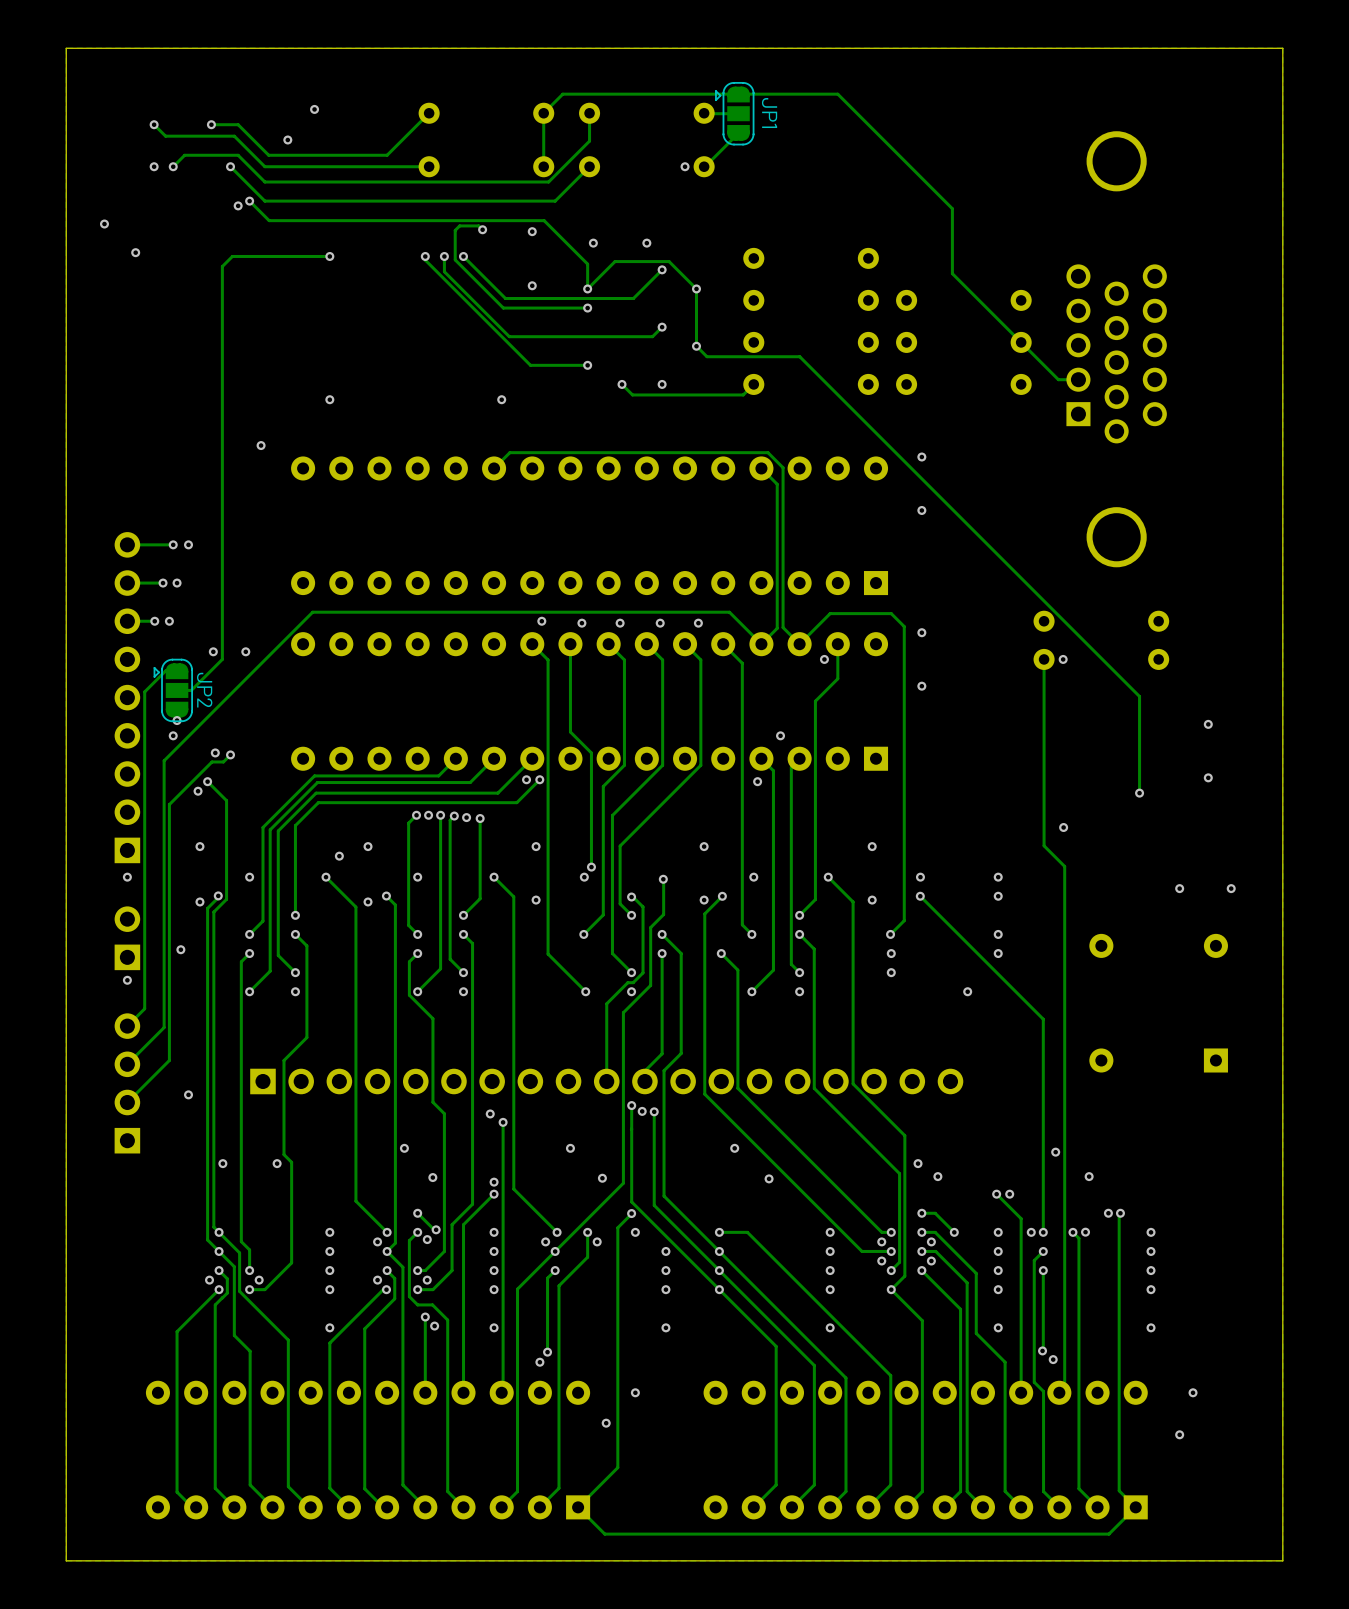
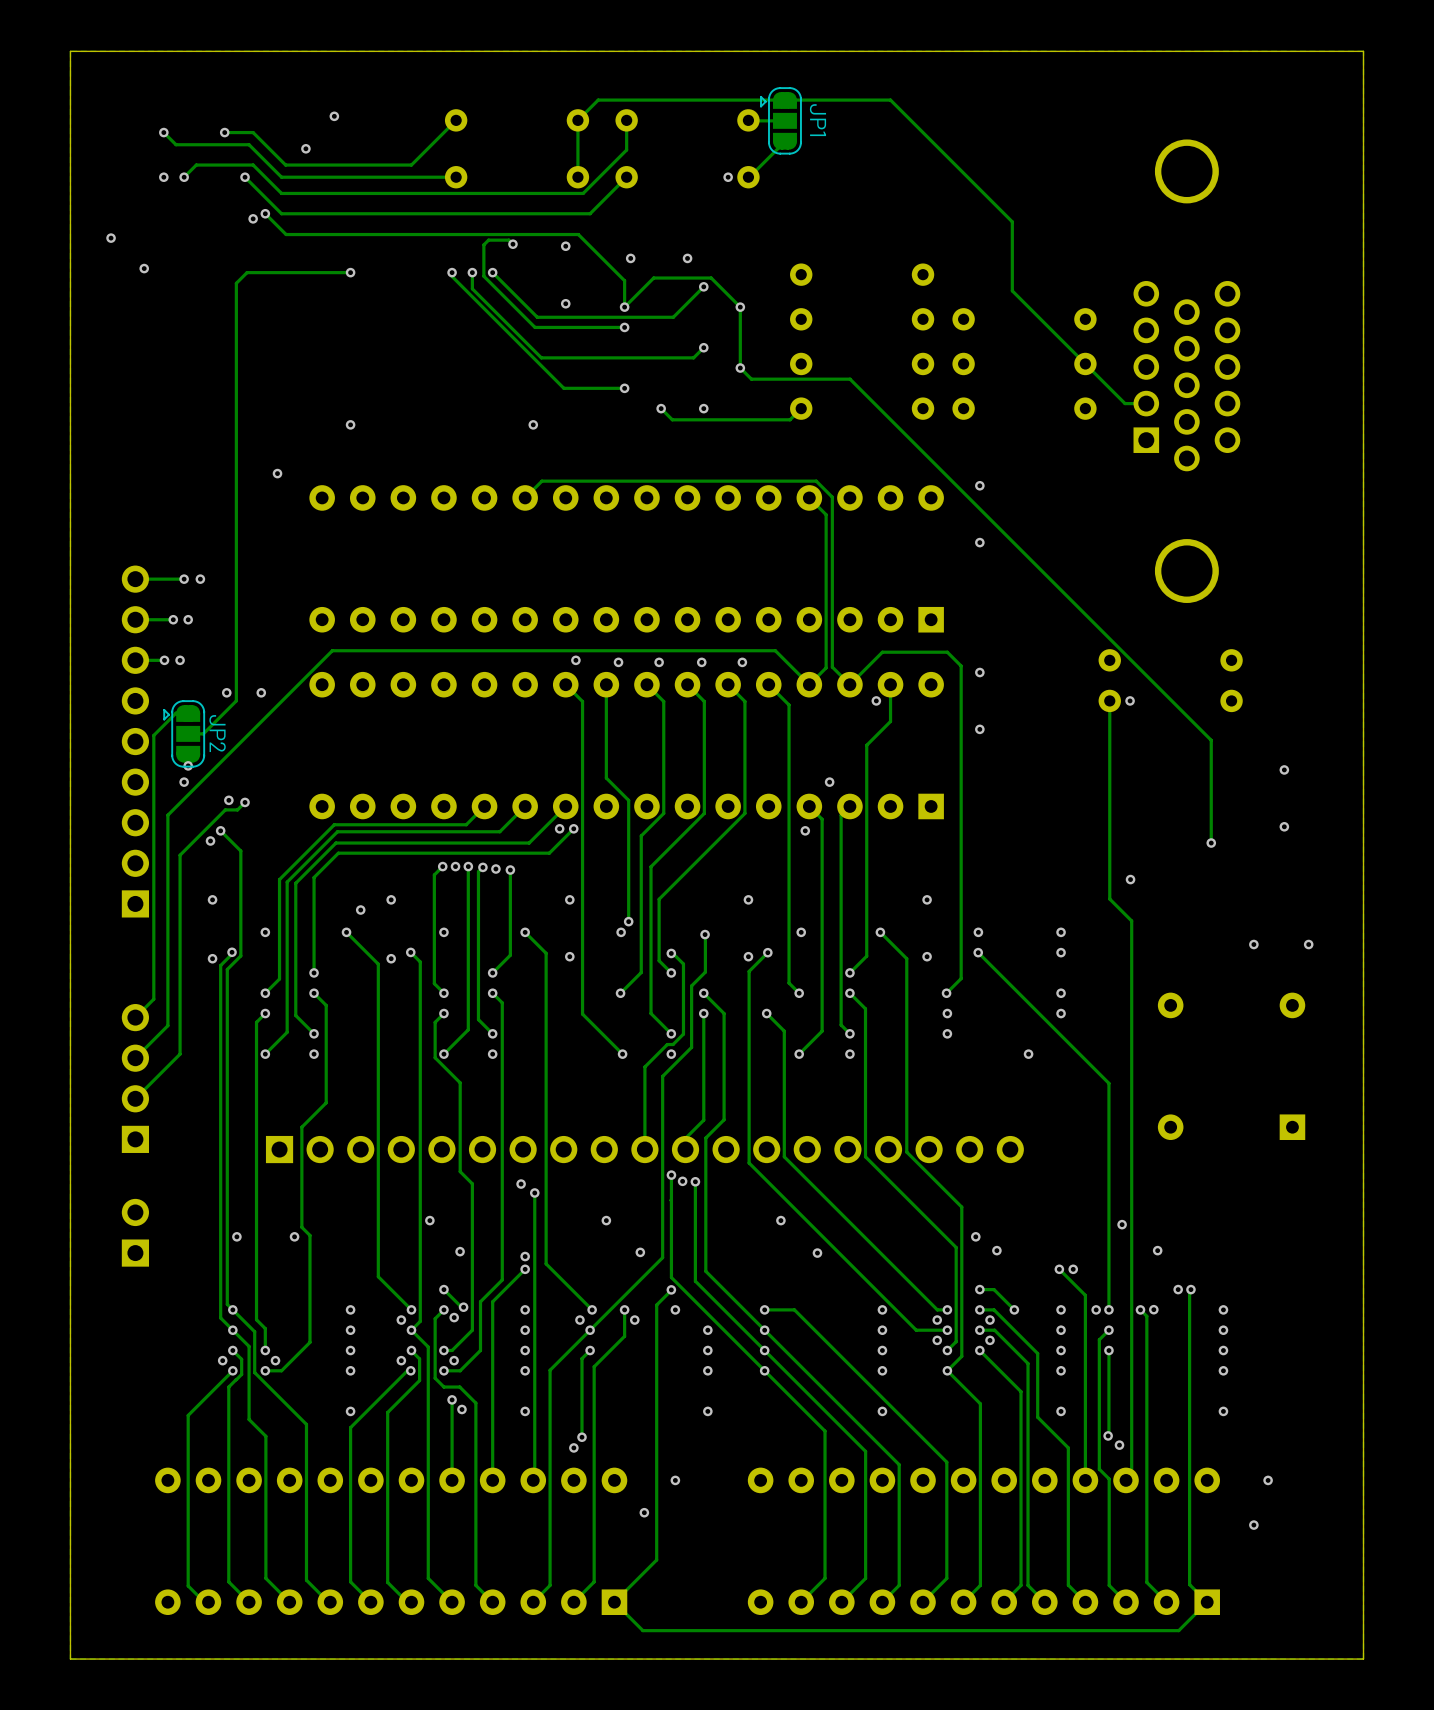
track: (164, 760) (164, 1027) (127, 1064) -> (174, 808) (167, 815) (167, 1025) (135, 1058)
via: (127, 877) -> none
part position: (127, 938) -> (135, 1232)
track: (144, 940) (144, 1008) (127, 1026) -> (153, 999) (135, 1017)
via: (180, 949) -> none
via: (127, 980) -> none
track: (169, 991) (169, 1060) (127, 1102) -> (180, 1054) (135, 1098)
part position: (127, 1083) -> (135, 1078)
via: (188, 1094) -> none

